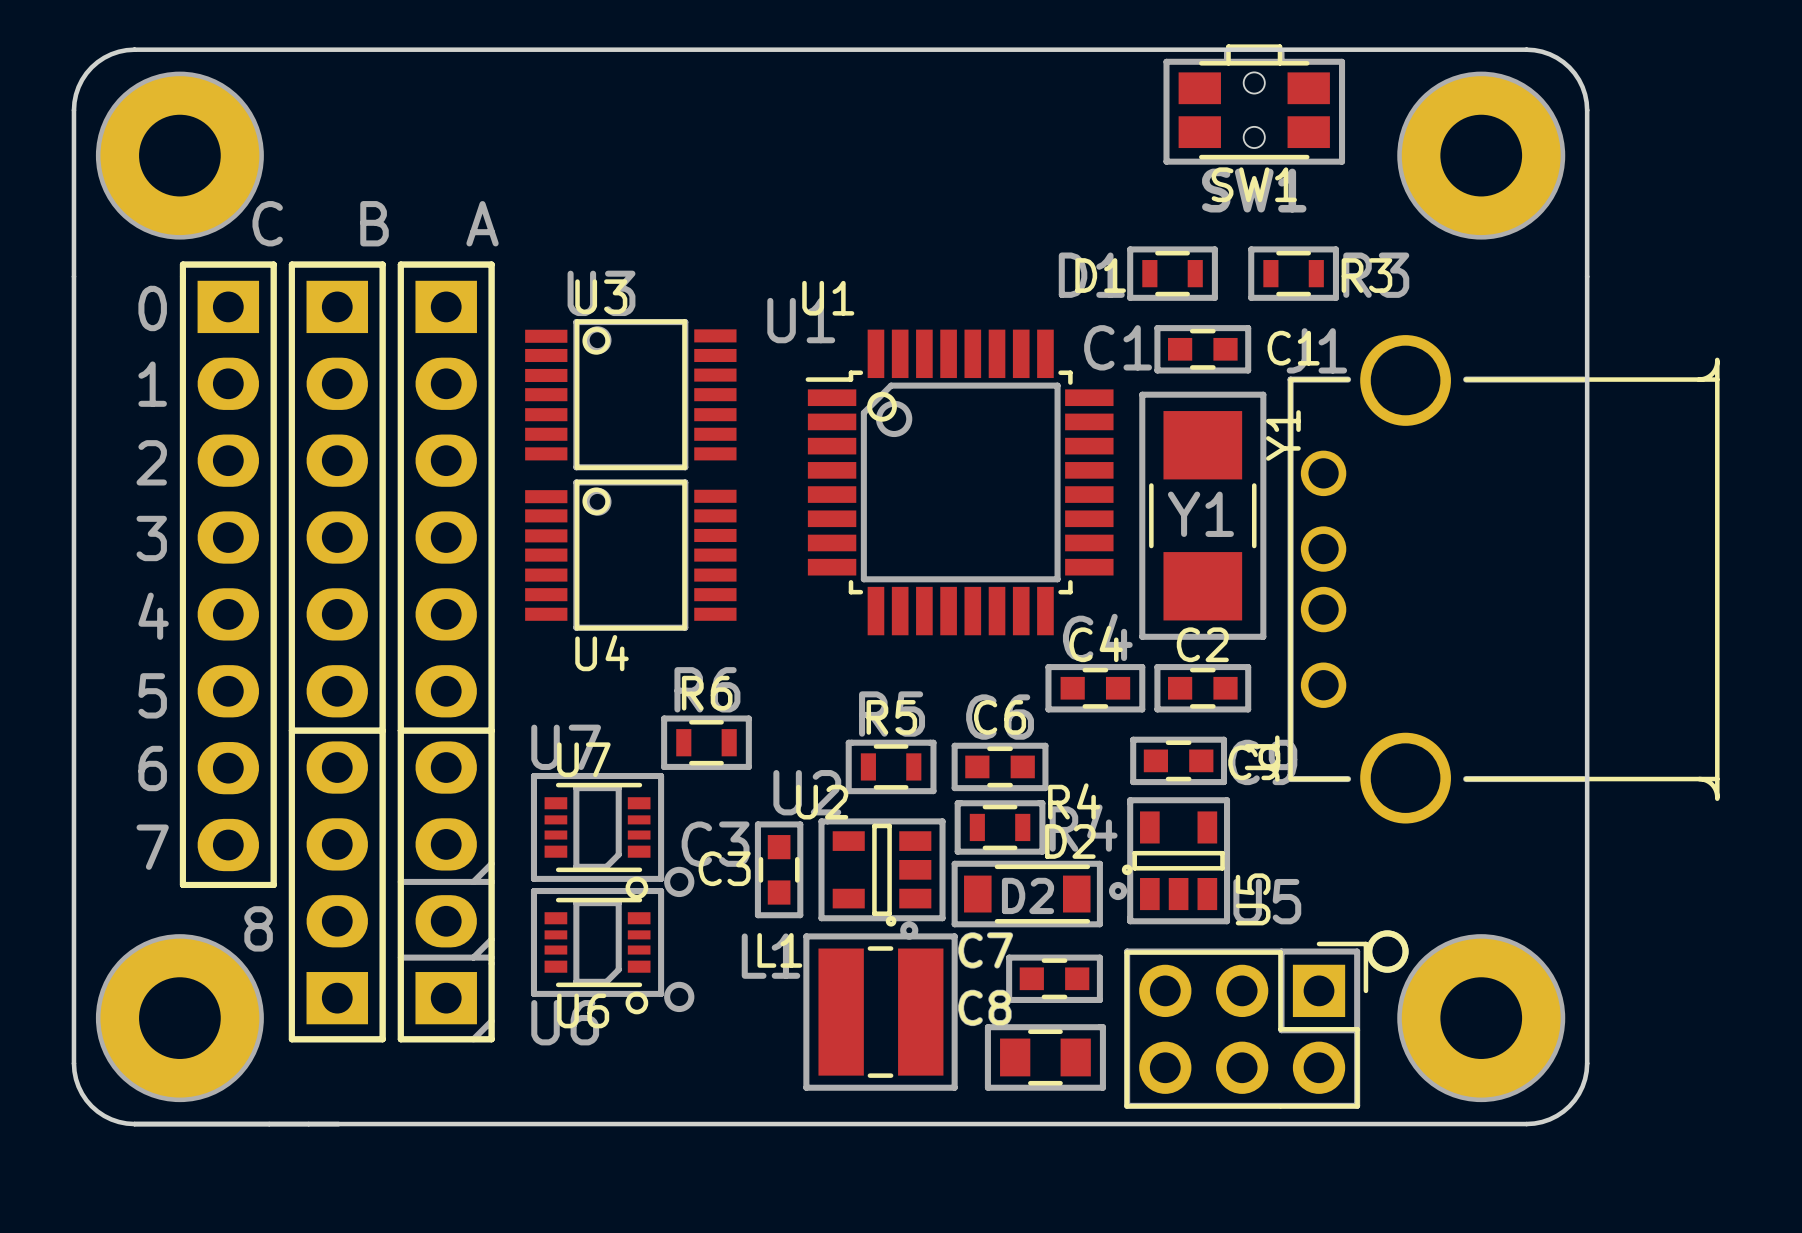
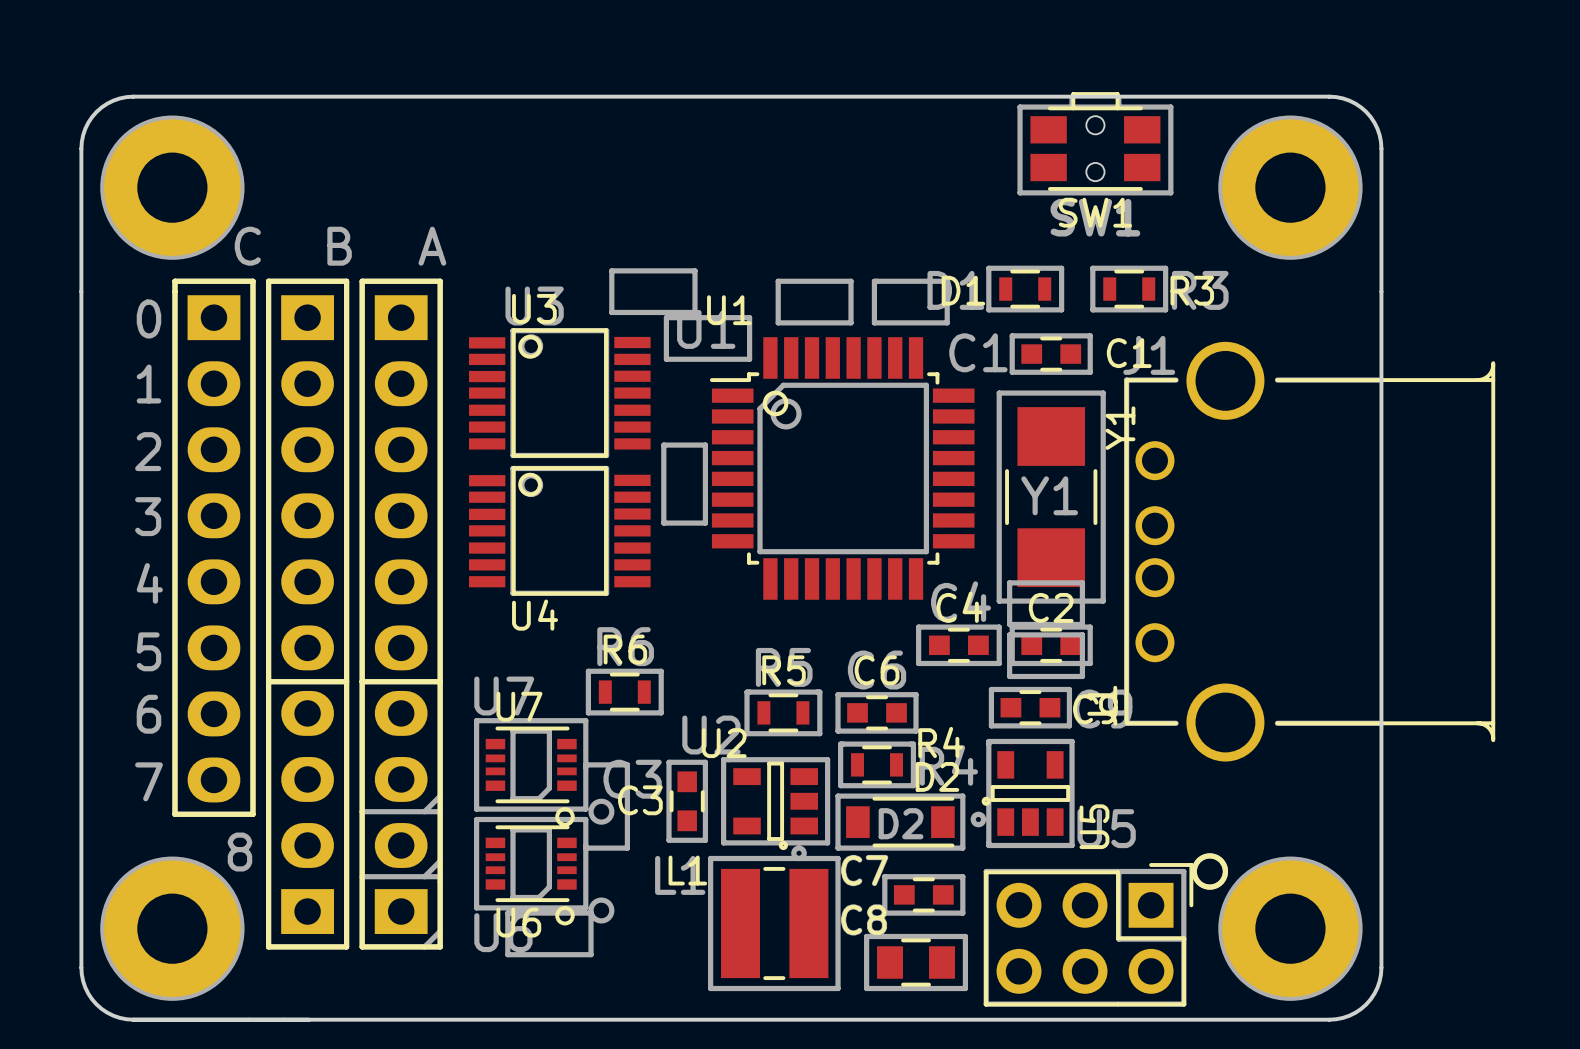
line: none -> (611, 270) (695, 270) (695, 312) (611, 312) (611, 270)
line: none -> (778, 281) (851, 281) (851, 322) (778, 322) (778, 281)
line: none -> (874, 281) (947, 281) (947, 322) (874, 322) (874, 281)
line: none -> (666, 317) (749, 317) (749, 359) (666, 359) (666, 317)
line: none -> (663, 445) (663, 523) (705, 523) (705, 445) (663, 445)
line: none -> (1009, 582) (1009, 624) (1082, 624) (1082, 582) (1009, 582)
line: none -> (1009, 634) (1009, 676) (1082, 676) (1082, 634) (1009, 634)
line: none -> (585, 764) (627, 764) (627, 848) (585, 848)
line: none -> (507, 913) (591, 913) (591, 954) (507, 954) (507, 913)

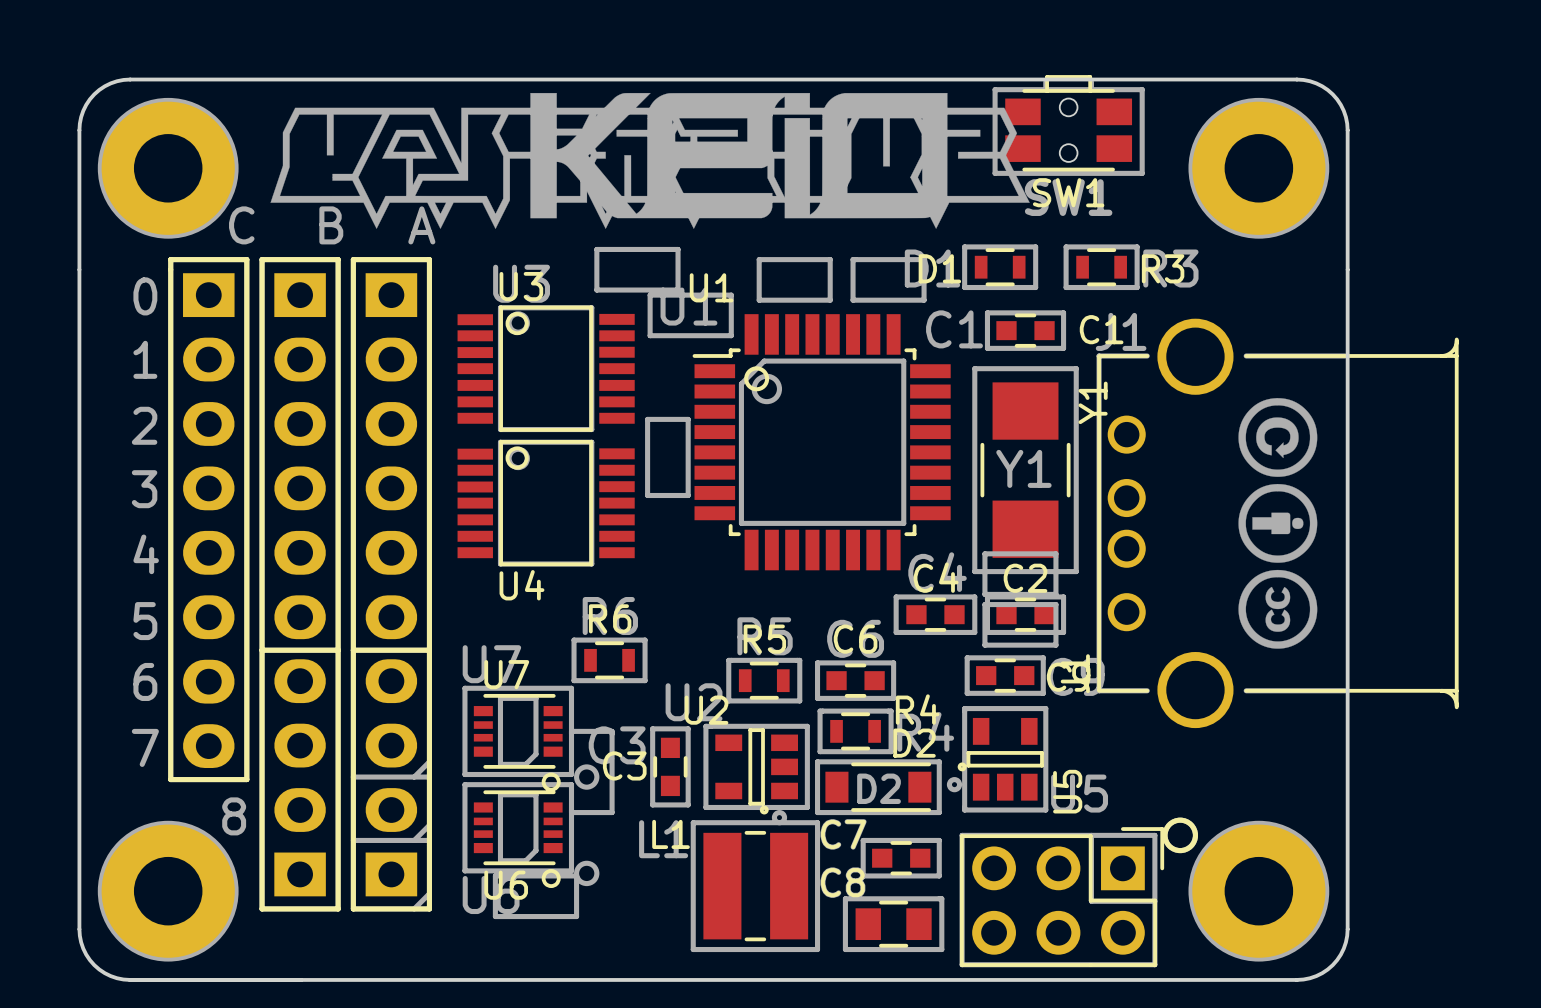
drawing: none -> [270, 92, 1030, 229]
drawing: none -> [1238, 398, 1318, 649]

